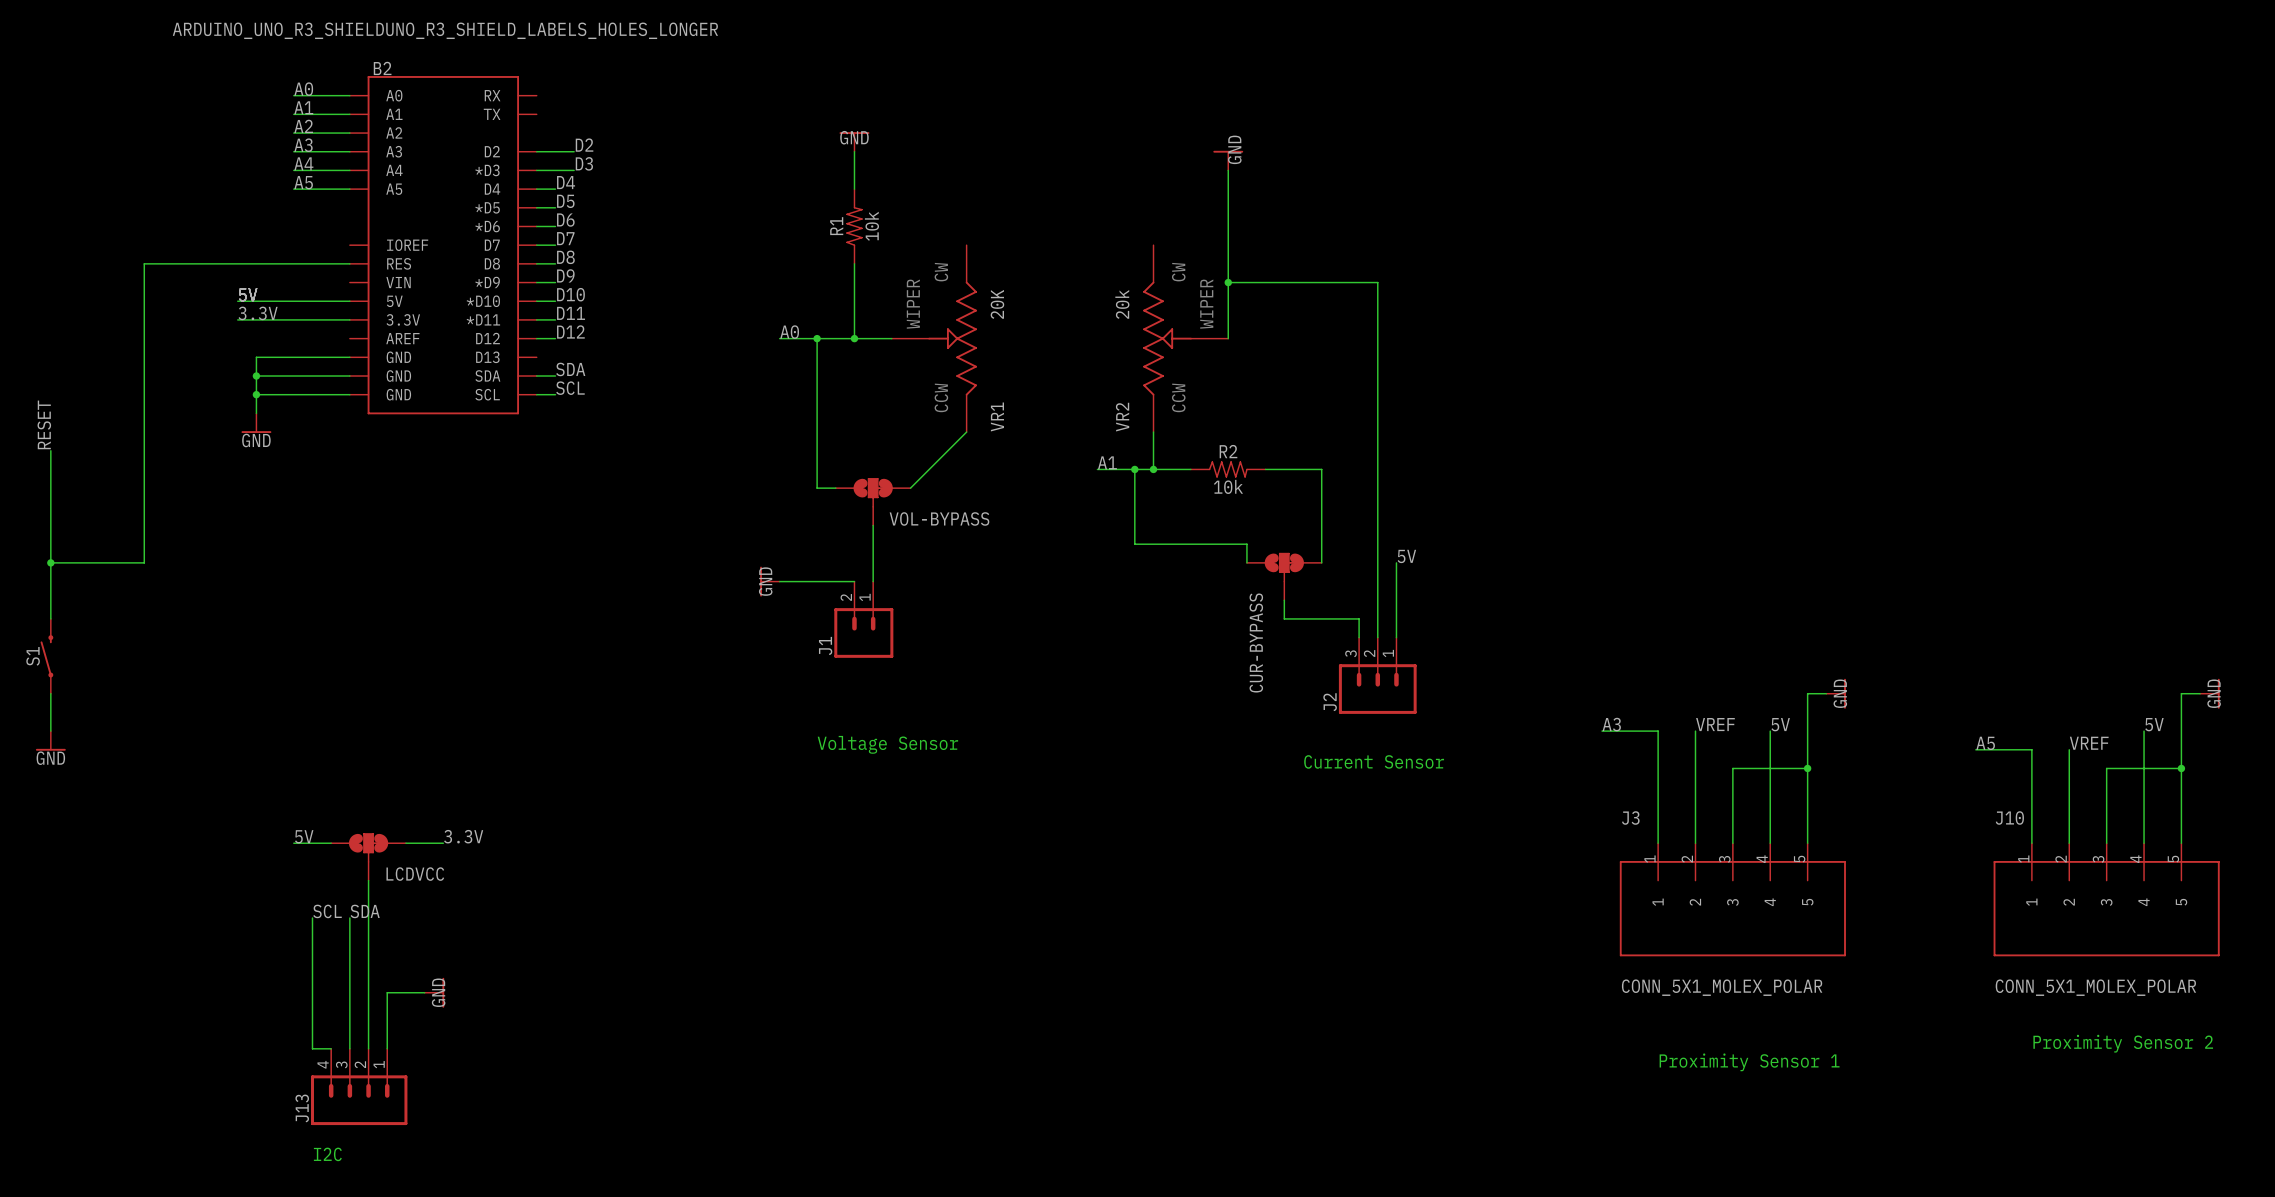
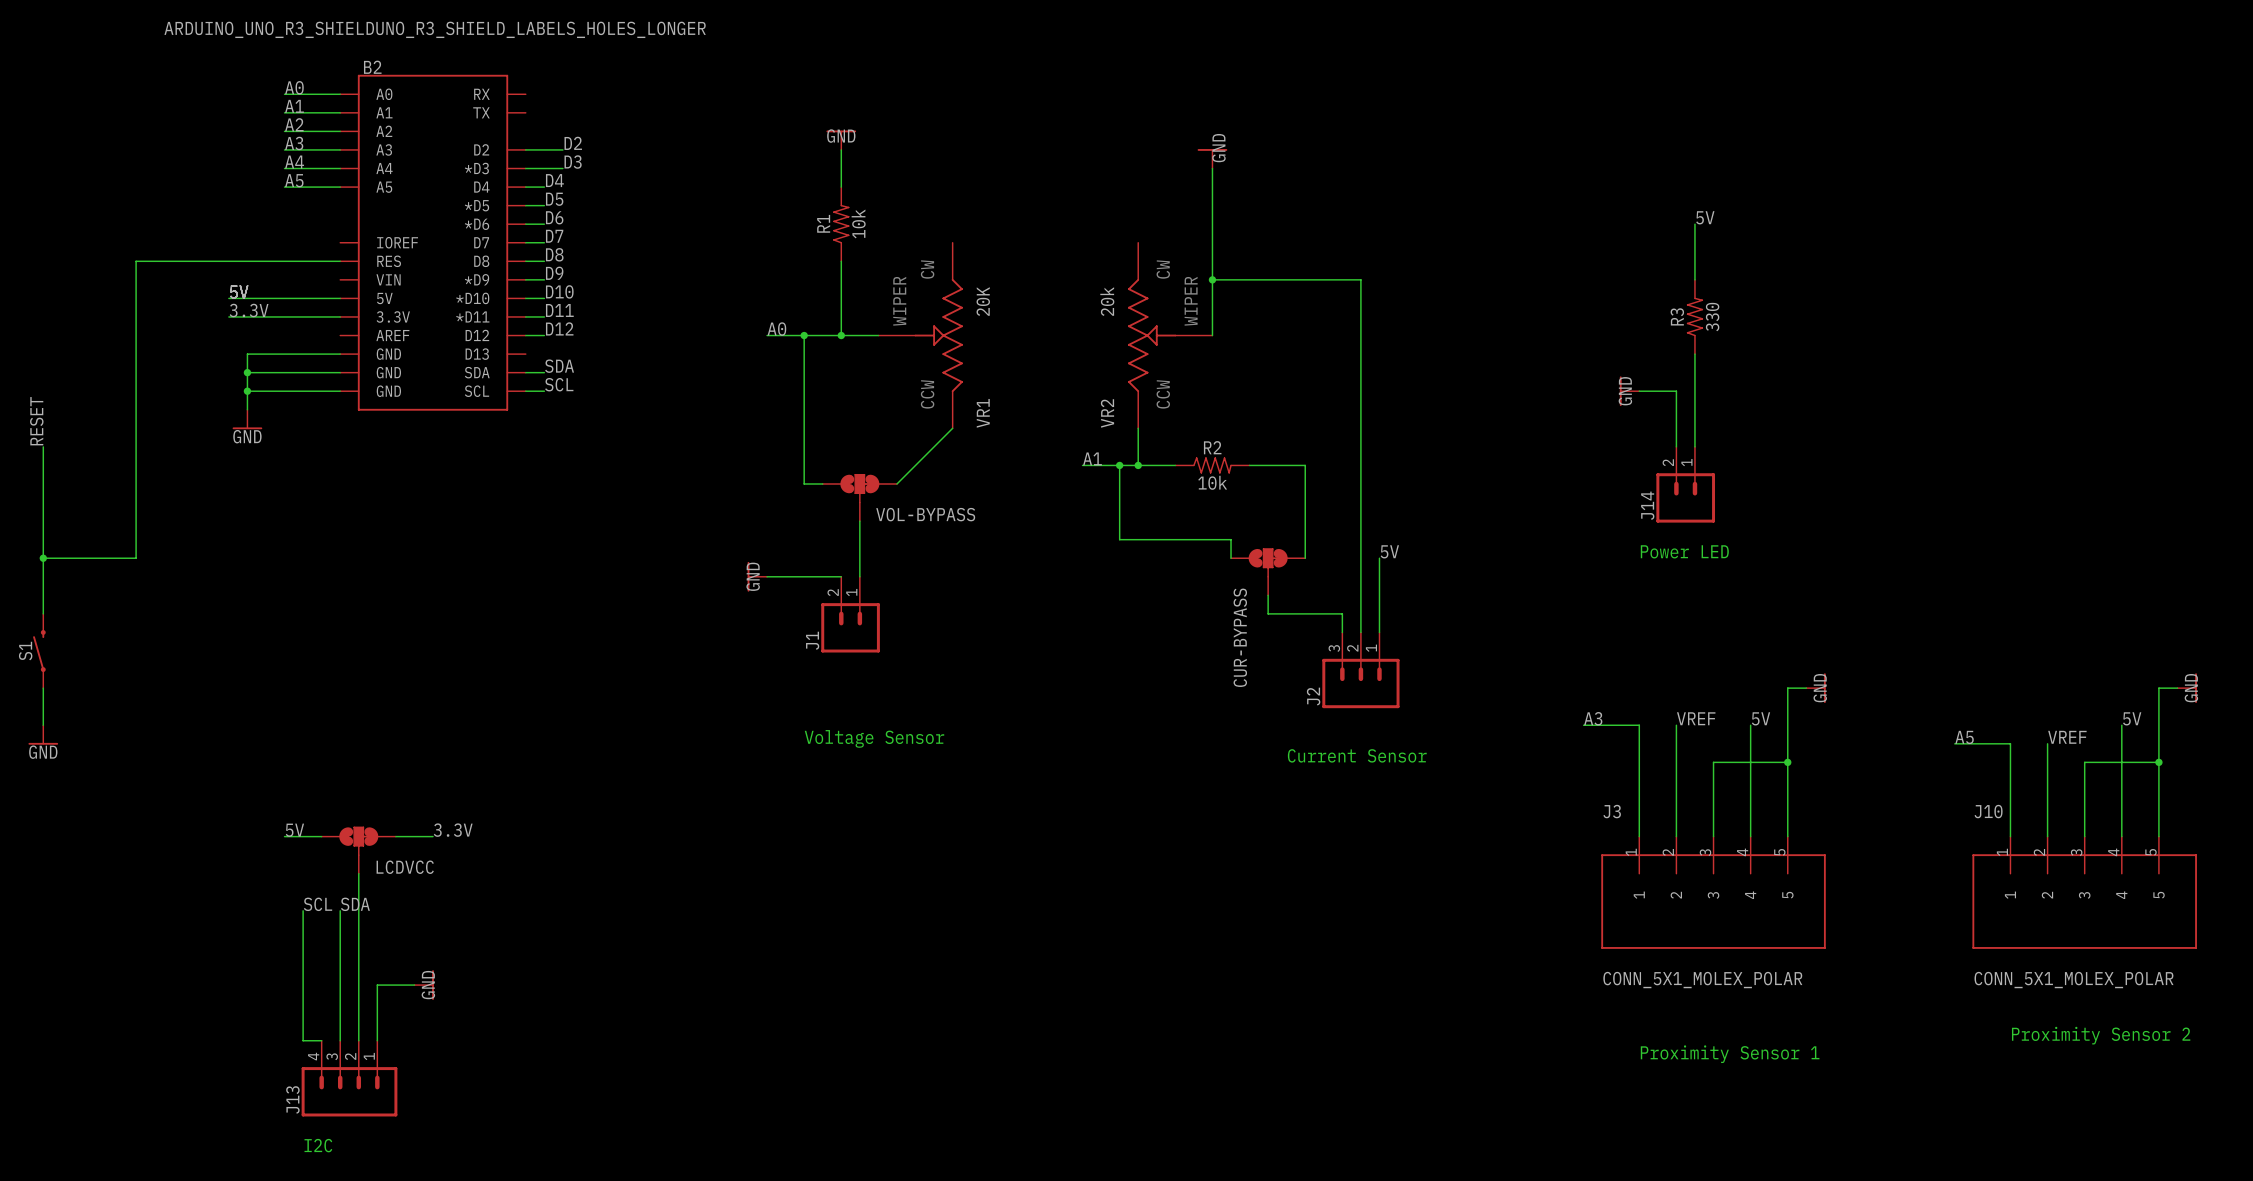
label: none -> 5V (1705, 217)
wire: none -> (1694, 224) (1694, 279)
R3: none -> 330 (1694, 316)
wire: none -> (1694, 354) (1694, 446)
power symbol: none -> GND (1629, 391)
wire: none -> (1639, 391) (1676, 391) (1676, 446)
J14: none -> (1685, 484)
text: none -> Power LED (1684, 551)

